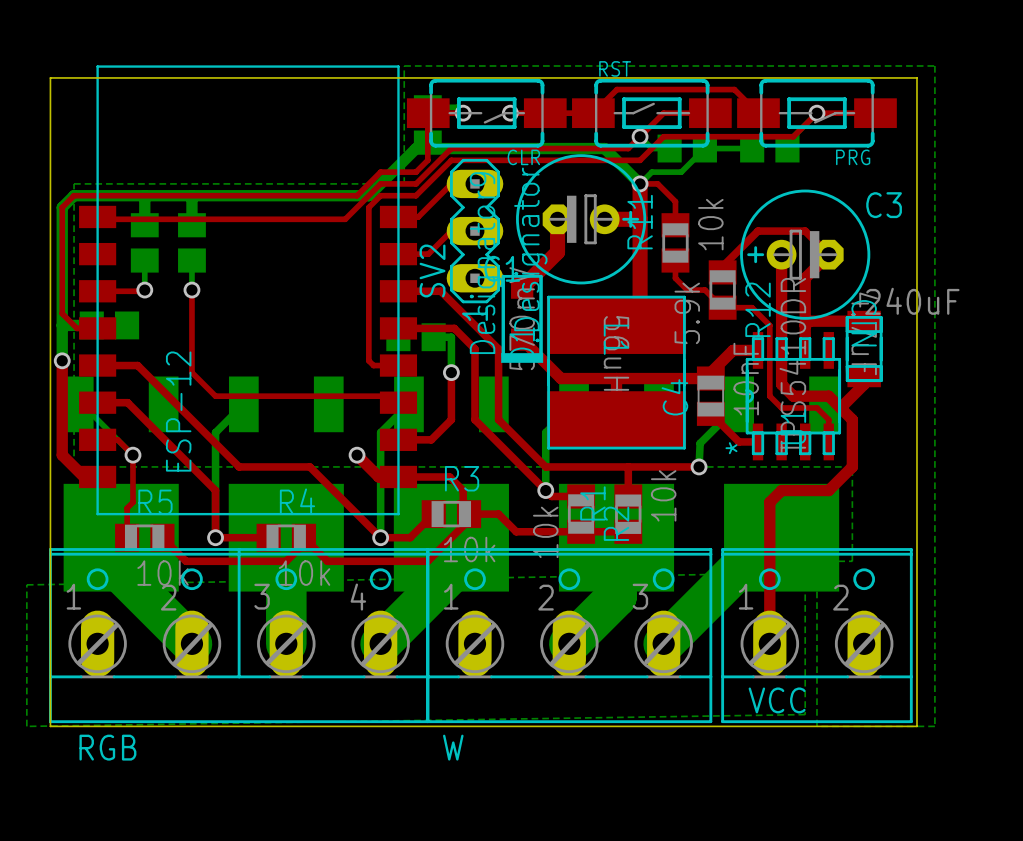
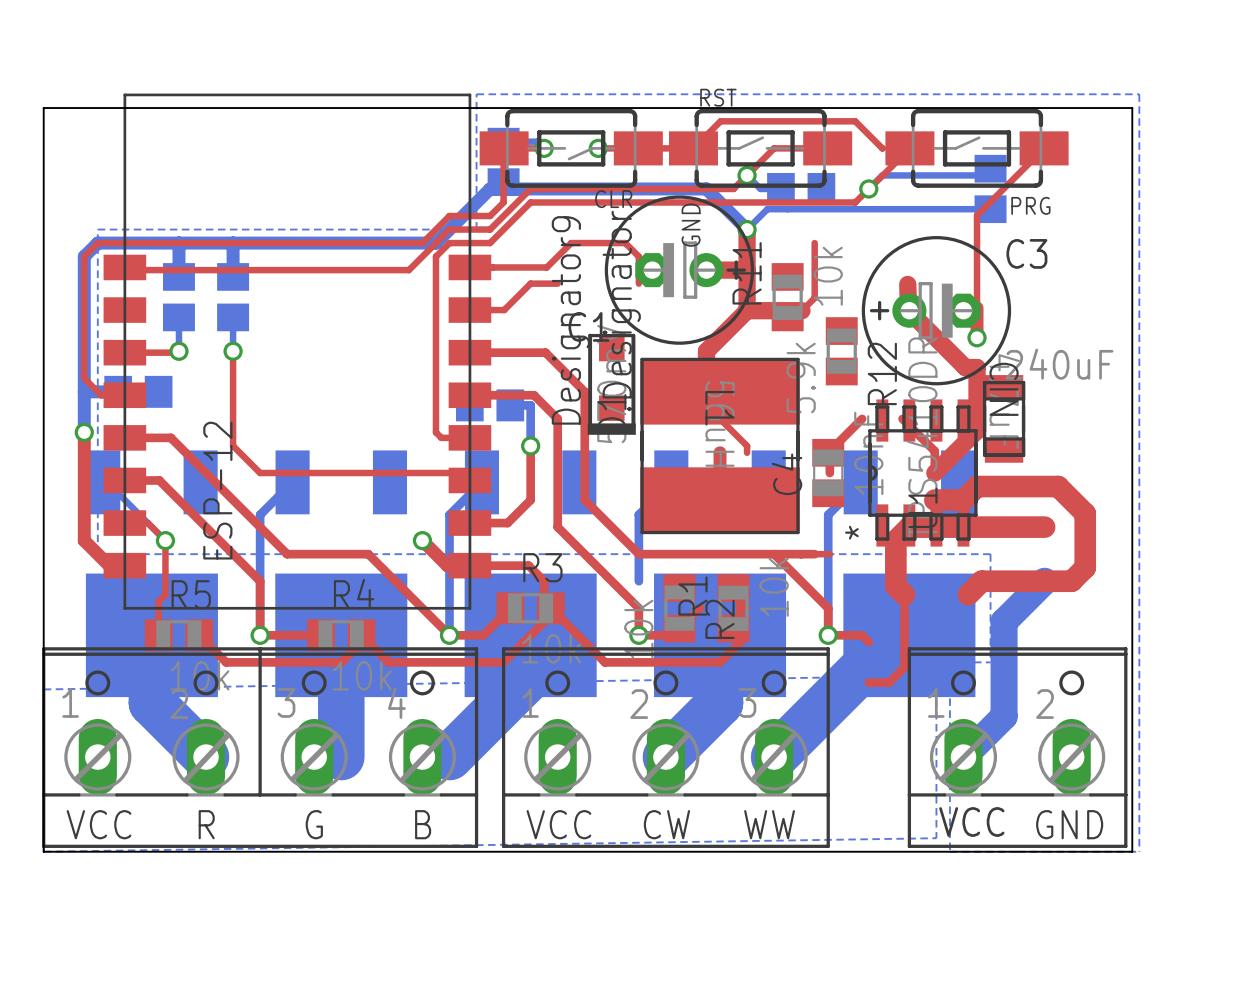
bottom zone outline: (934, 65) (934, 726) -> (1085, 94) (1139, 94) (1139, 851) (1085, 851)
board edge: (50, 77) (50, 726) -> (70, 108) (43, 108) (43, 851) (70, 851)
board edge: (916, 77) (916, 726) -> (1064, 108) (1132, 108) (1132, 851) (1064, 851)
PRG rotation: 0° (816, 113) -> 180° (977, 148)
via position: (816, 113) -> (868, 188)
top track: (875, 113) (816, 113) (793, 136) (663, 136) (640, 160) -> (909, 148) (855, 202) (747, 202)
top track: none -> (1044, 148) (977, 215) (977, 337)
bottom track: none -> (990, 168) (988, 173) (983, 175) (882, 175) (868, 188)
bottom track: (752, 148) (704, 148) (681, 172) (651, 172) -> (990, 209) (767, 209) (760, 216)
part rotation: 0° (769, 148) -> 90° clockwise (990, 188)
part position: (769, 148) -> (990, 188)
text: none -> GND (691, 225)
top track: (474, 183) (451, 183) (418, 216) -> (638, 283) (638, 256) (625, 243) (571, 243) (546, 267) (492, 267)
top track: (640, 183) (657, 183) (675, 201) (675, 225) -> none
top track: none -> (814, 243) (814, 297) (801, 310) (747, 310) (706, 351) (706, 405) (747, 445) (747, 452)
top track: (557, 219) (557, 252) (522, 287) -> none
SV2: (474, 231) -> none
top track: none -> (907, 284) (908, 310) (965, 367) (977, 367) (977, 430) (934, 473) (934, 451) (902, 418)
top track: (640, 254) (640, 319) -> none
top track: (781, 254) (781, 384) (793, 396) (828, 396) (852, 419) (852, 466) (828, 490) (781, 490) (769, 502) (769, 643) -> none
top track: (675, 260) (675, 278) (687, 290) (704, 290) (722, 307) (752, 307) (769, 325) (769, 396) (781, 407) (816, 407) (828, 419) (828, 441) -> none
top track: (722, 272) (722, 266) (758, 231) (805, 231) (828, 254) (805, 278) (805, 350) -> none
via: none -> (977, 337)
top track: (440, 291) (498, 349) -> (518, 352) (545, 352) (584, 391) (584, 418)
top track: (864, 321) (809, 321) (805, 325) -> none
top track: (522, 339) (561, 378) (710, 378) (710, 372) (733, 350) (758, 350) -> none
top track: none -> (862, 418) (829, 451) (829, 473)
top track: (864, 376) (864, 384) (840, 407) -> none
top track: (710, 413) (738, 441) (758, 441) -> none
top track: (474, 419) (551, 496) (581, 496) -> (557, 500) (557, 527) (638, 608) (638, 635) (672, 635) (699, 608)
top track: none -> (934, 500) (963, 500) (977, 486) (1058, 486) (1085, 513) (1085, 567) (1071, 581) (981, 581) (968, 594)
bottom track: (710, 432) (700, 443) (699, 466) -> (828, 514) (828, 635)
top track: none -> (1044, 527) (909, 527) (895, 540) (895, 586) (904, 594) (904, 667) (889, 682) (868, 682)
top track: (628, 466) (628, 496) -> none
top track: none -> (774, 554) (828, 608) (828, 635) (861, 635) (868, 642)
top track: none -> (814, 554) (829, 554)
via position: (699, 466) -> (828, 635)
via position: (545, 490) -> (638, 635)
bottom track: none -> (1044, 581) (1004, 621) (1004, 716) (963, 757)
top track: none -> (550, 608) (604, 662) (720, 662) (740, 642) (740, 601) (747, 608)
top track: (474, 514) (498, 514) (516, 531) (628, 531) -> none
bottom track: (121, 573) (191, 643) -> (151, 675) (151, 702) (206, 757)
part: none -> (260, 747)
RGB: (239, 635) -> none
VCC position: (816, 635) -> (1017, 747)
text: none -> VCC (99, 824)
text: none -> R (206, 824)
text: none -> G (314, 824)
text: none -> B (423, 824)
text: none -> VCC (558, 824)
text: none -> CW (666, 824)
text: none -> WW (769, 824)
text: none -> GND (1069, 824)
W name: W (453, 747) -> none

